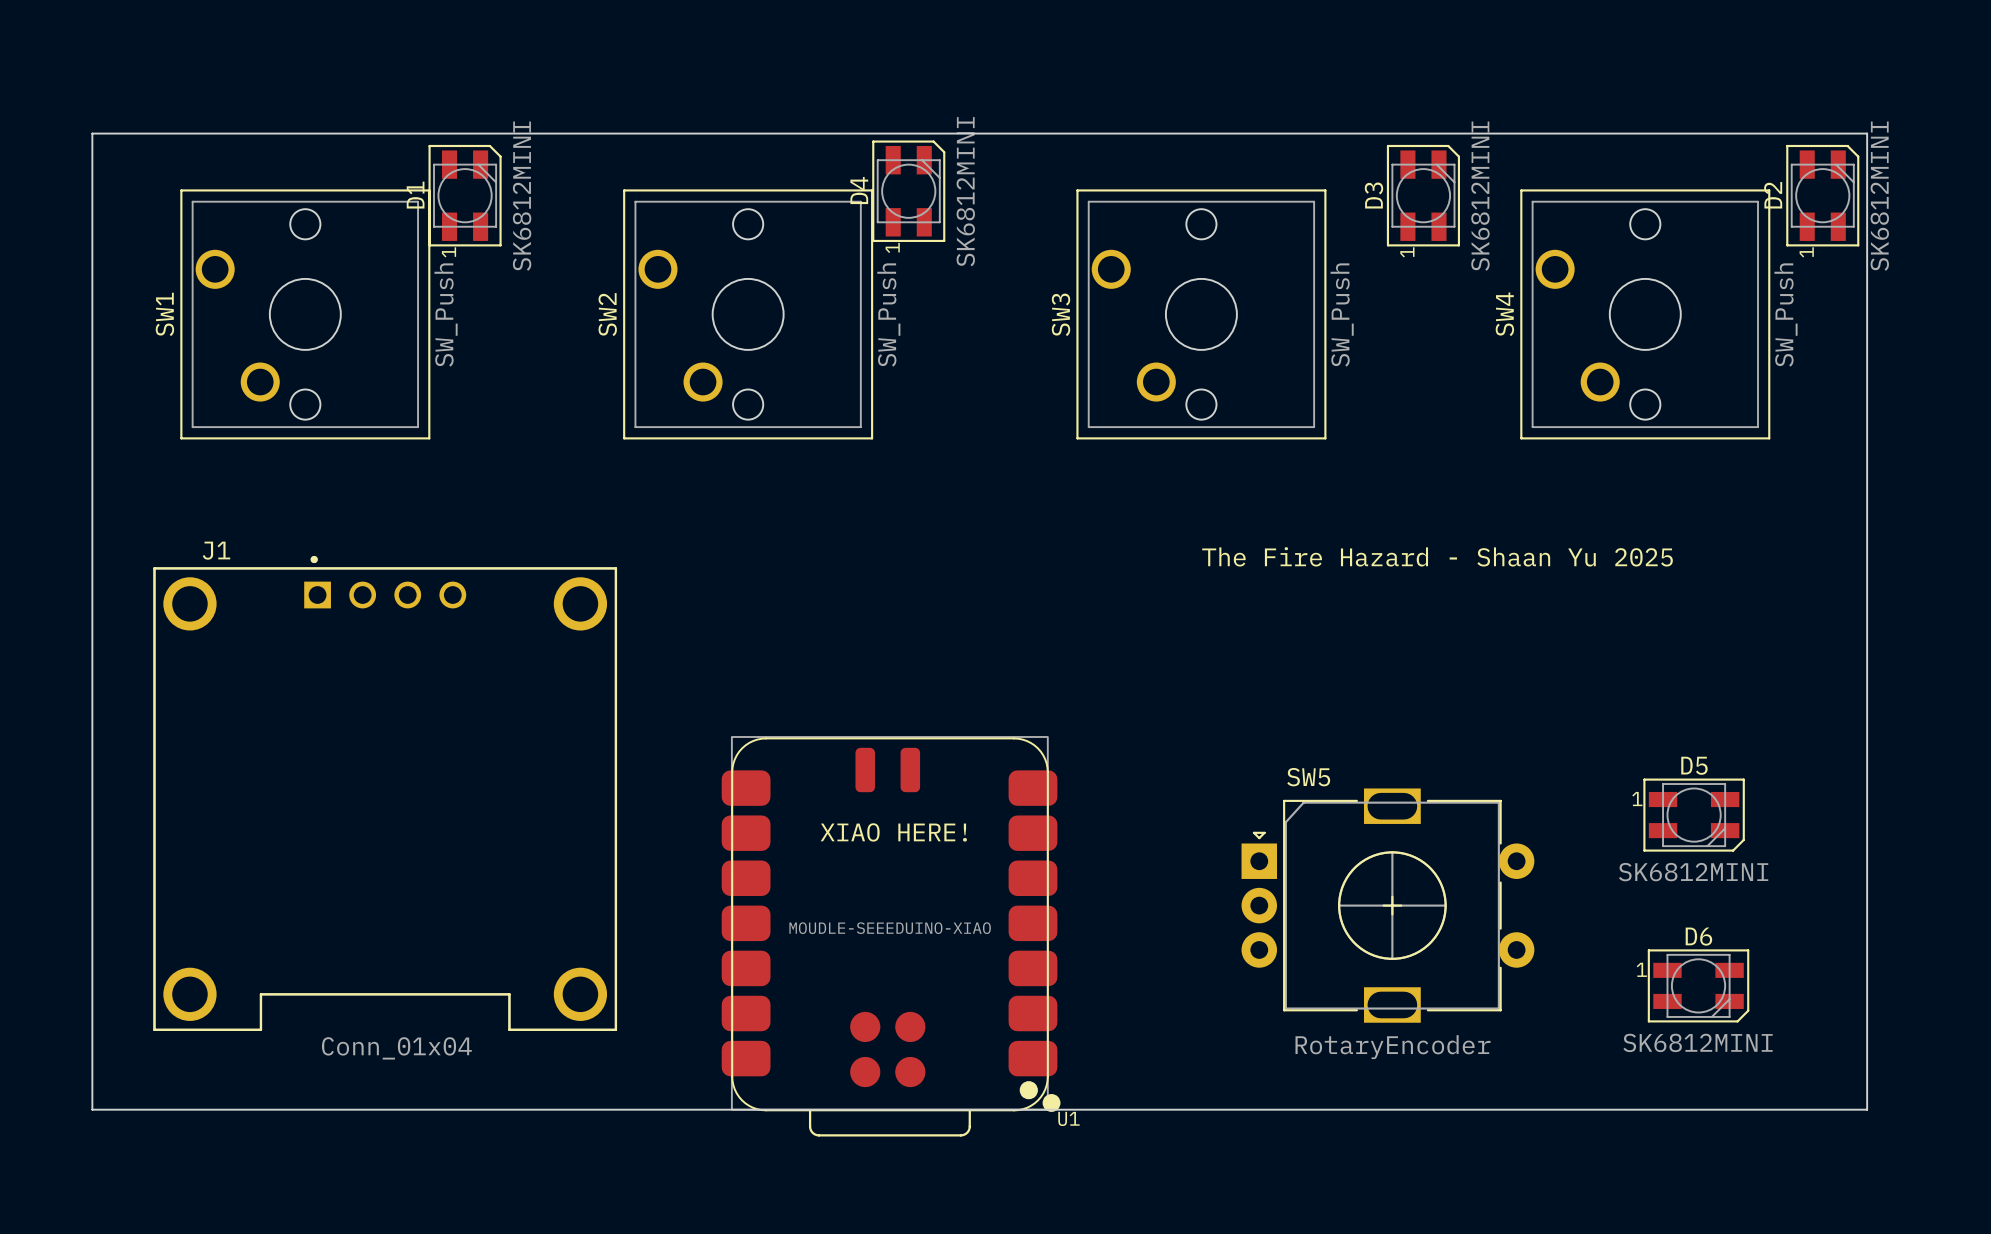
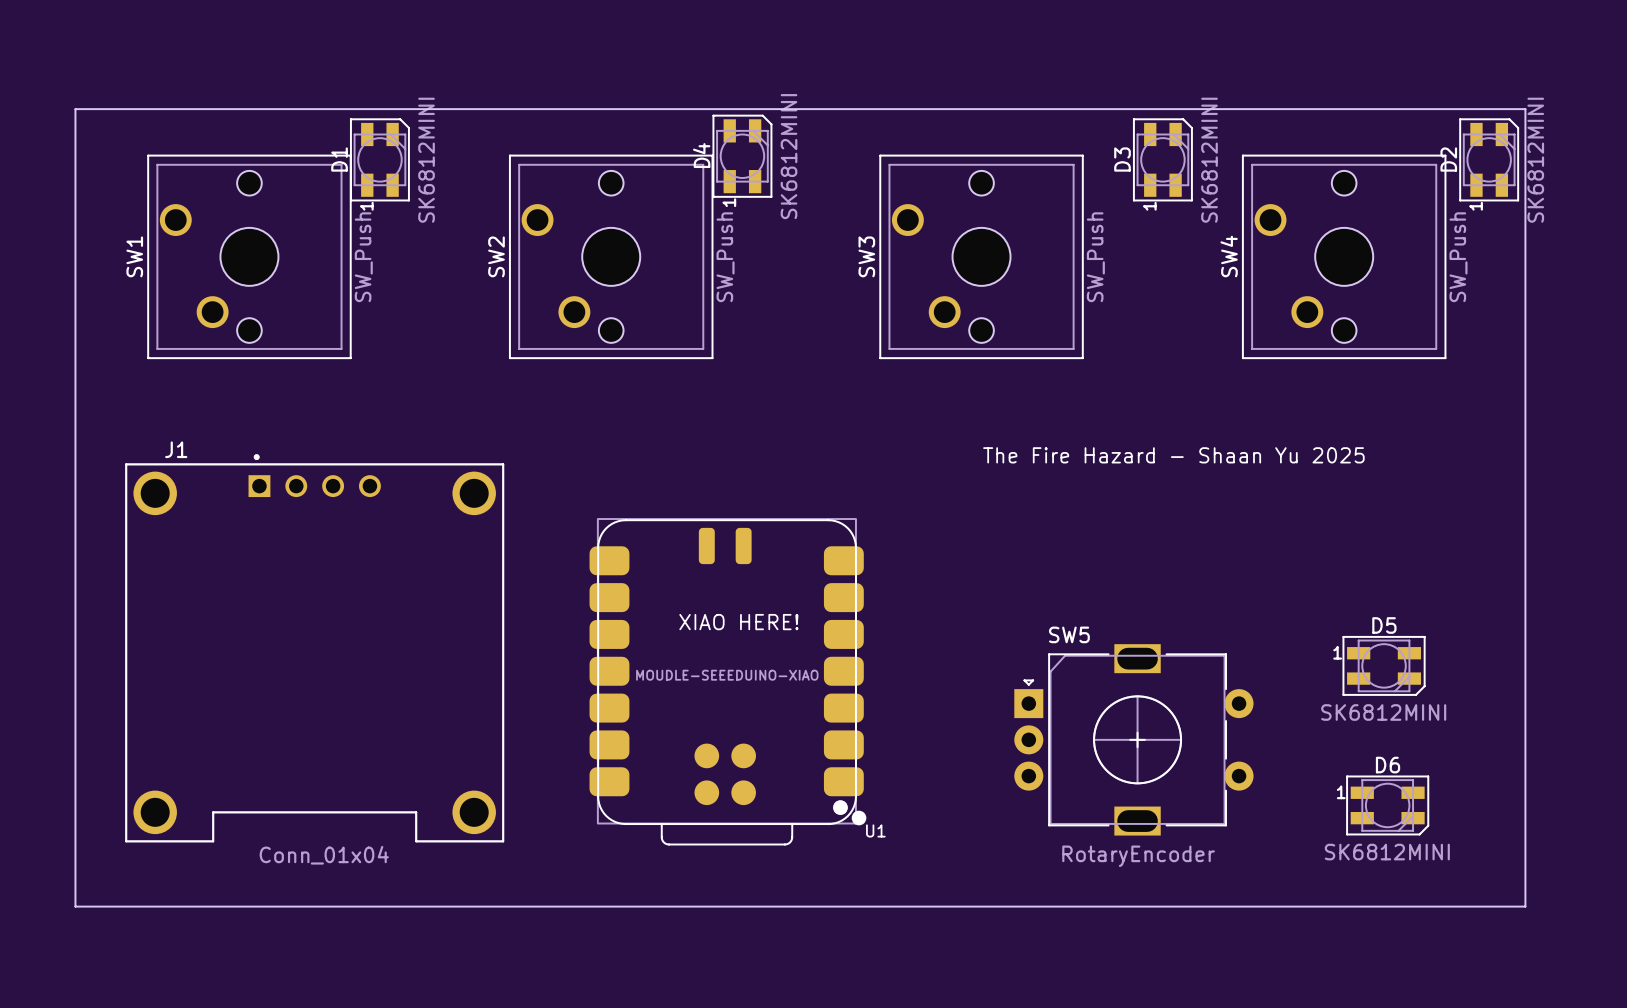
text position: XIAO HERE! (893, 832) -> XIAO HERE! (738, 622)
U1 position: (891, 936) -> (727, 681)

